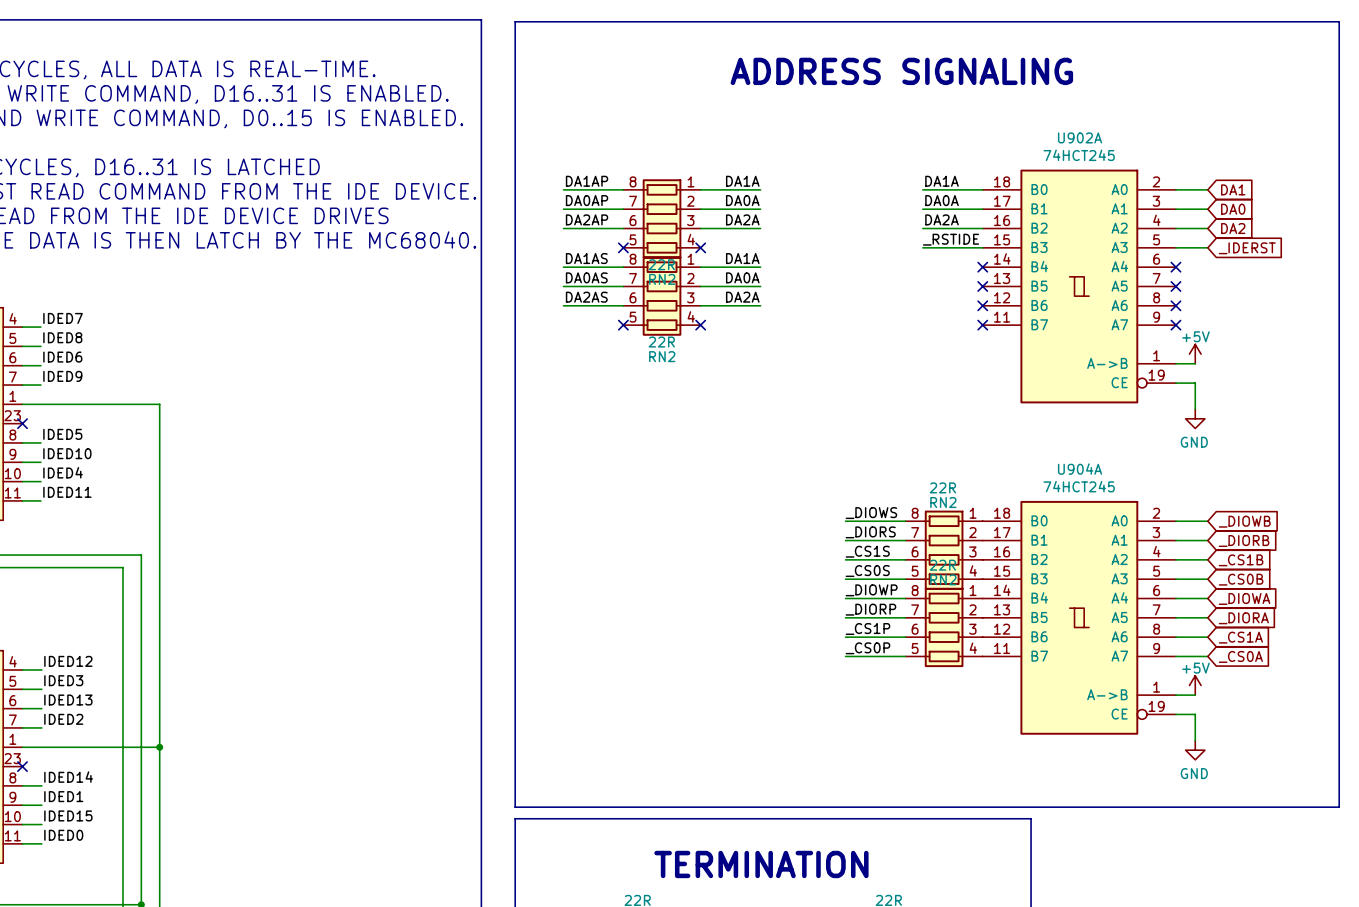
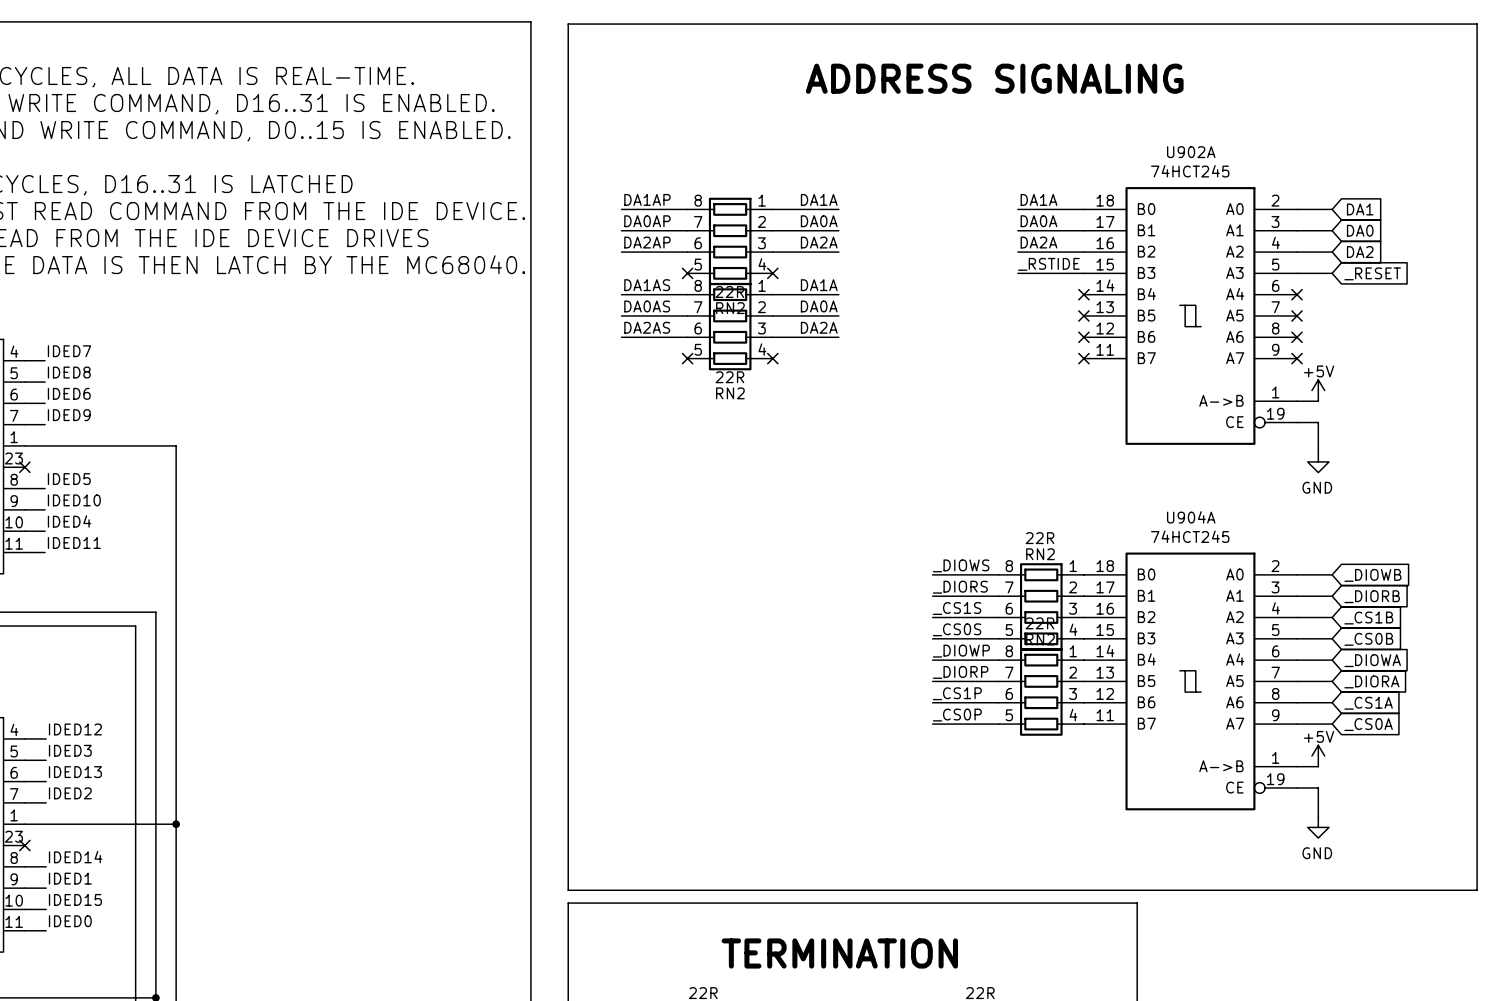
global label: _IDERST (1247, 248) -> _RESET (1372, 273)

